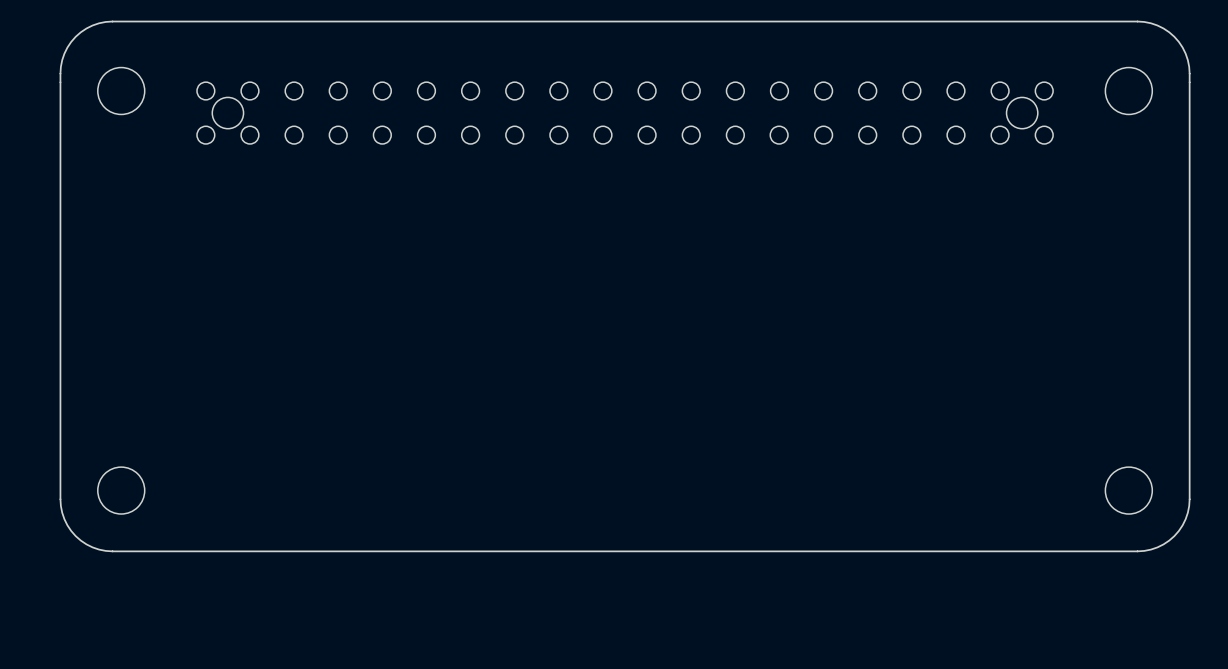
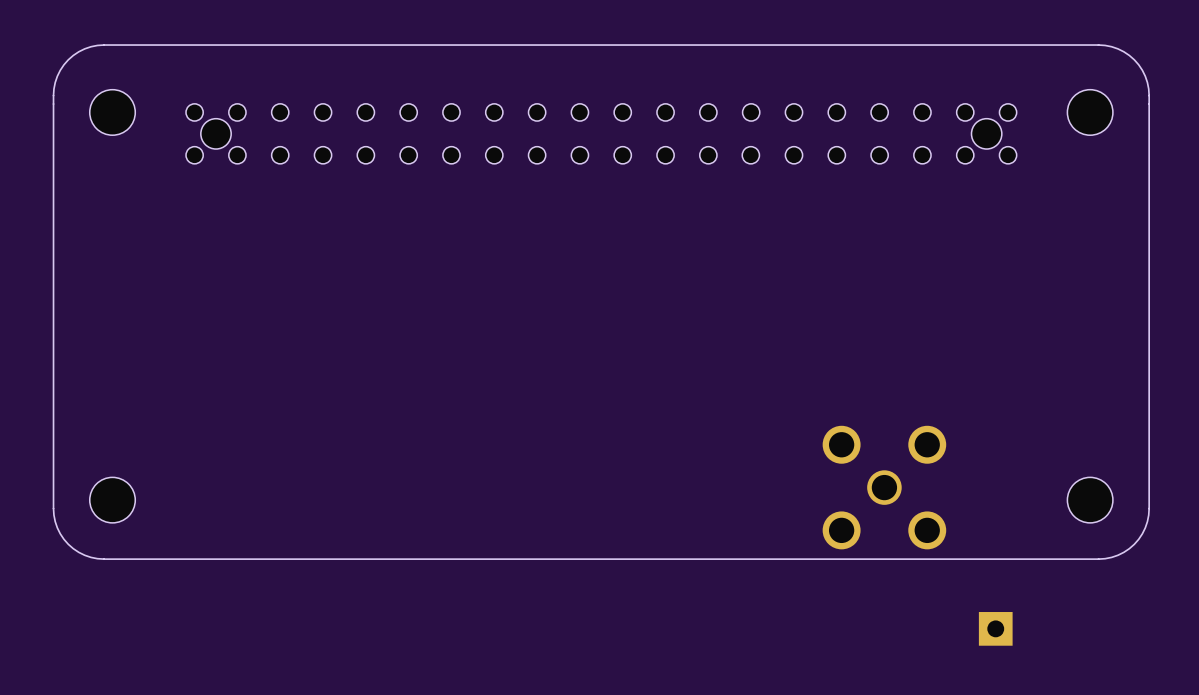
part: none -> (884, 487)
part: none -> (995, 628)

